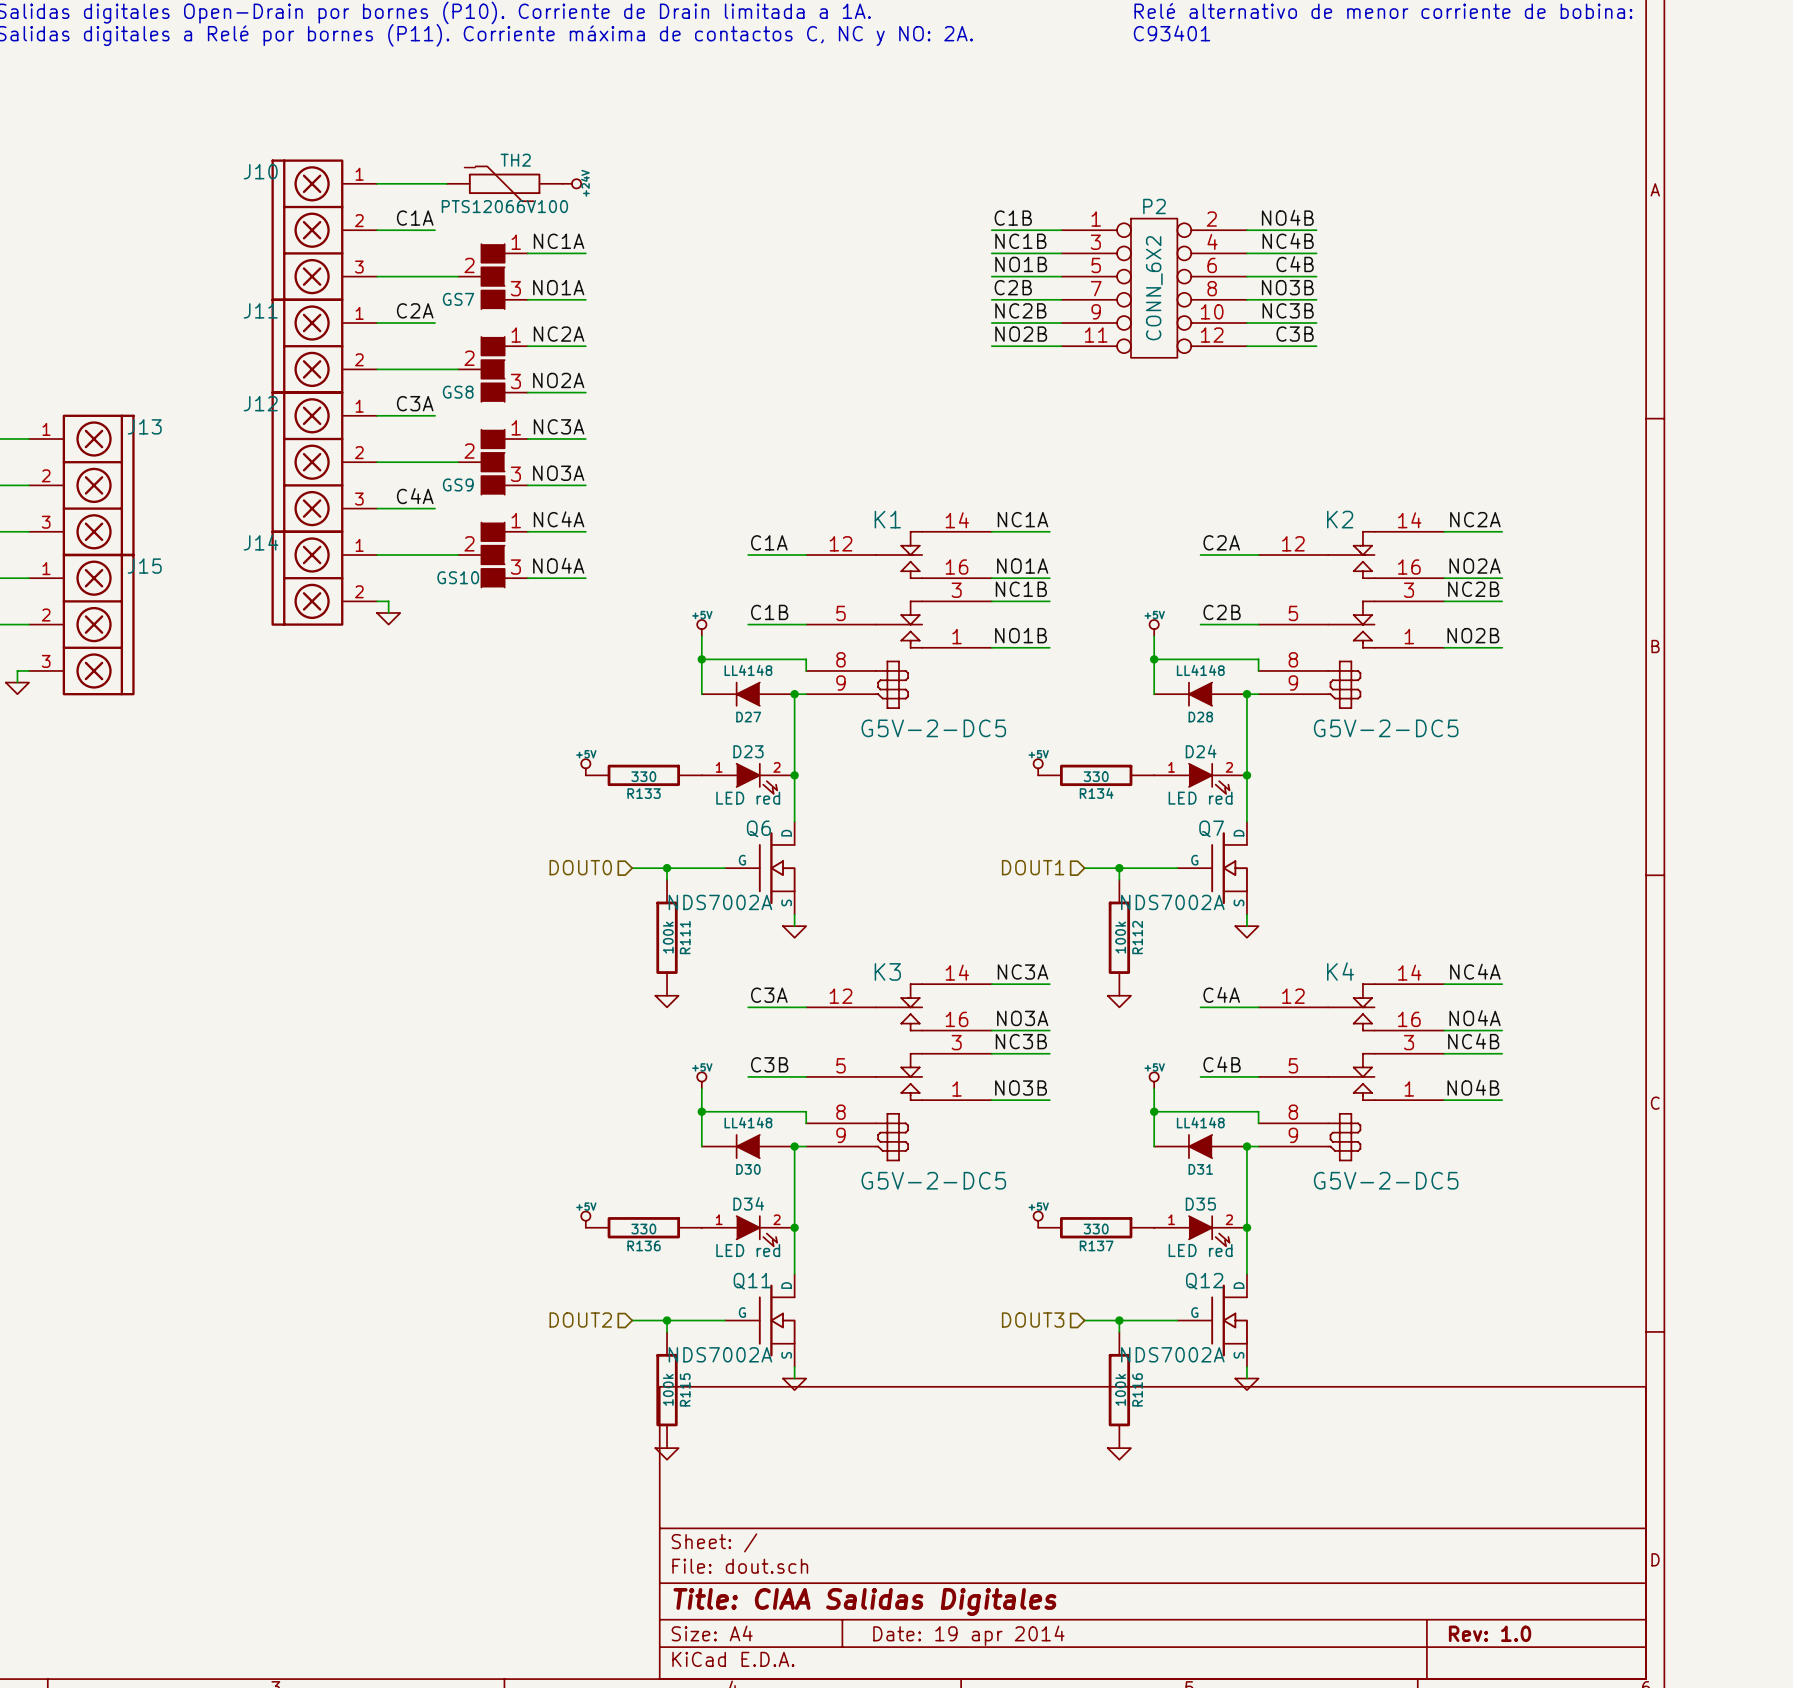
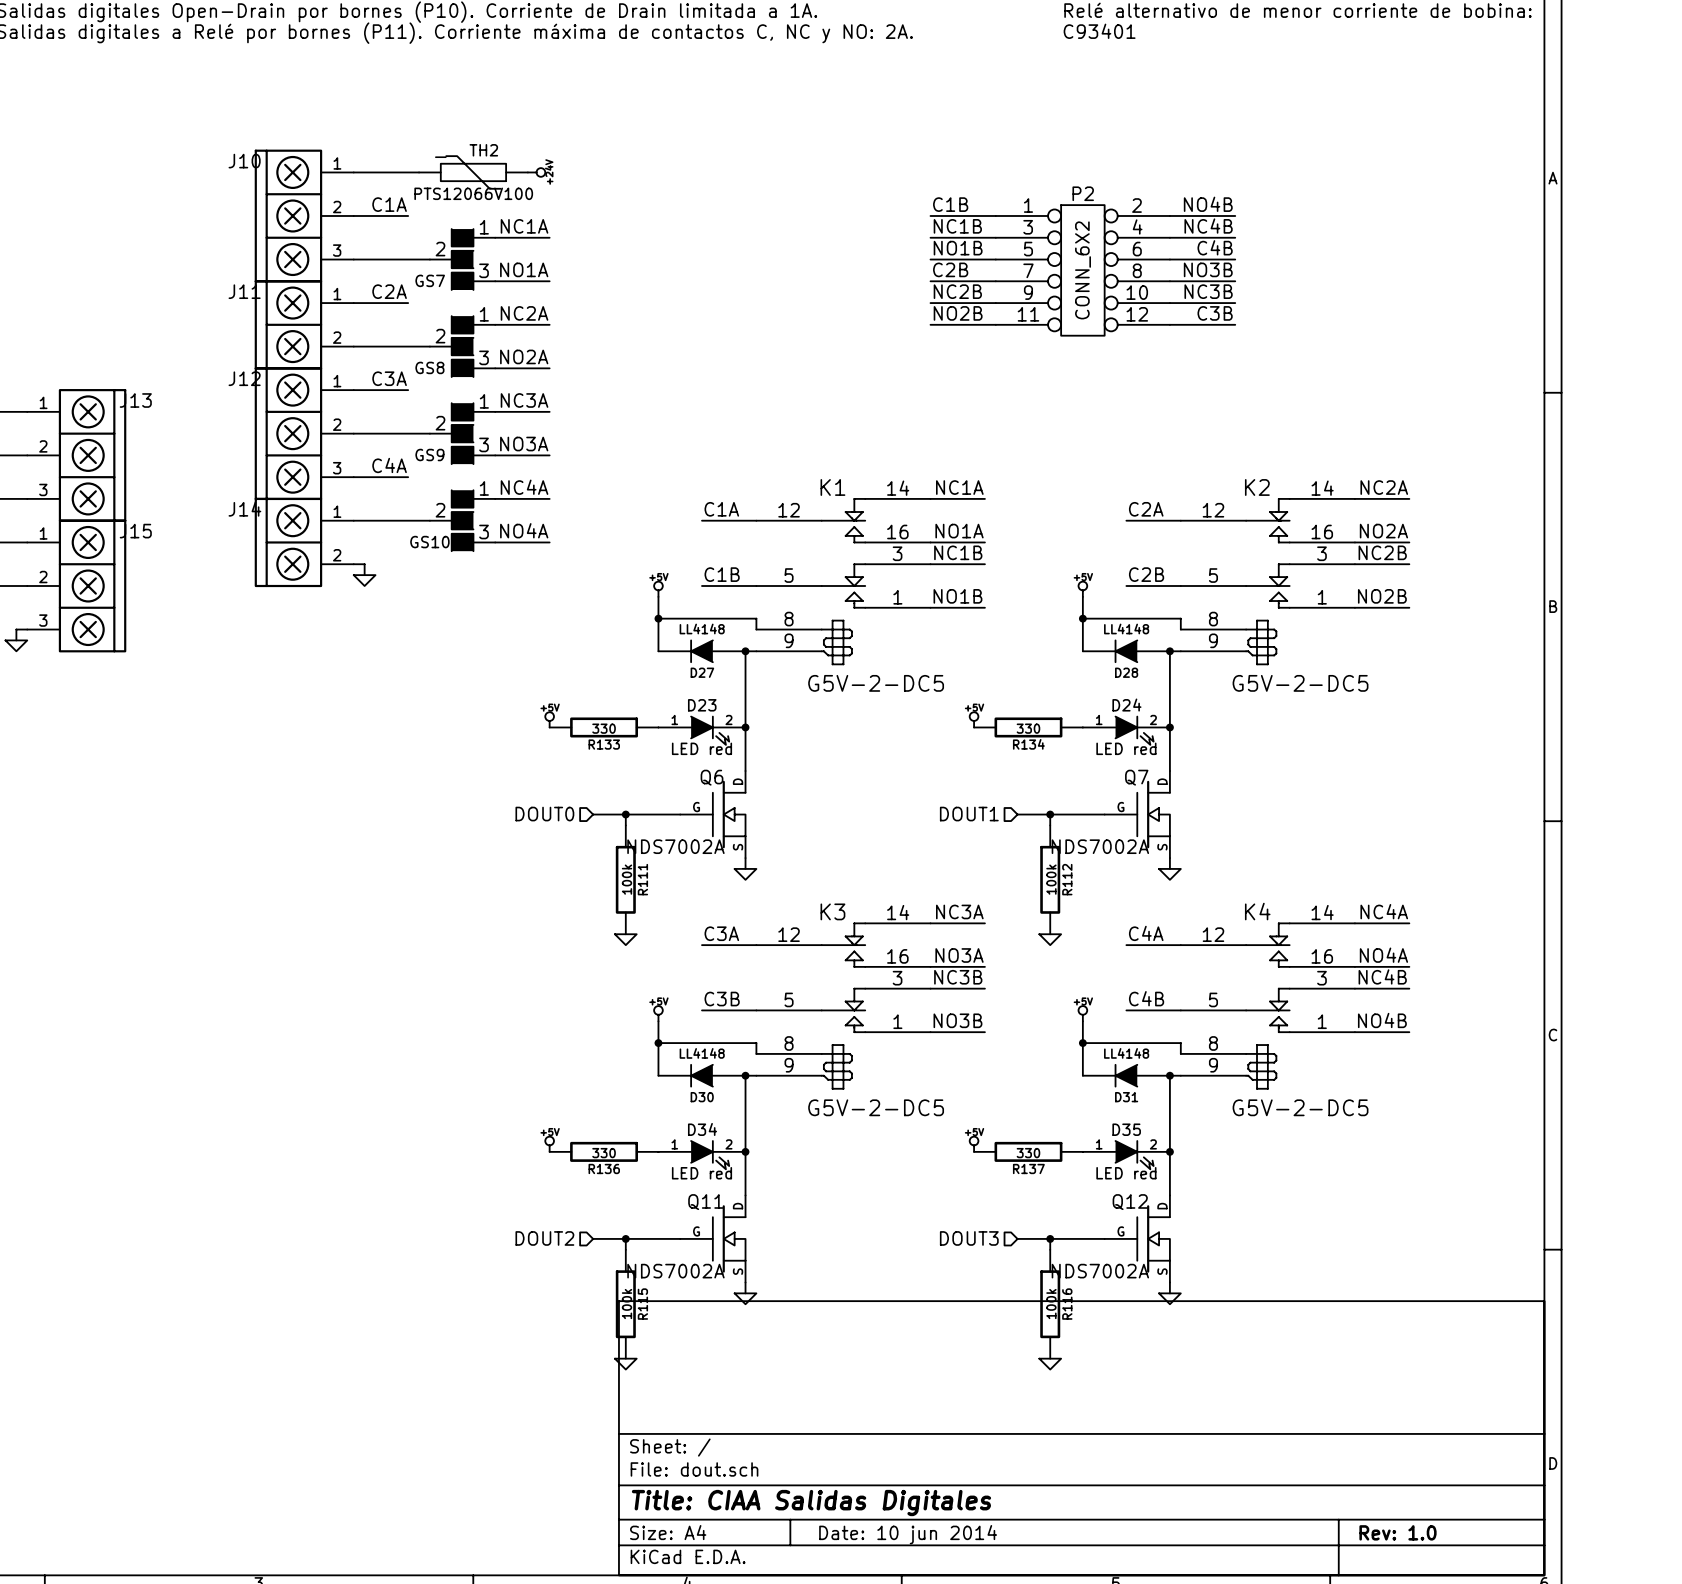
title block: Date: 19 apr 2014 (968, 1635) -> Date: 10 jun 2014 (908, 1534)

